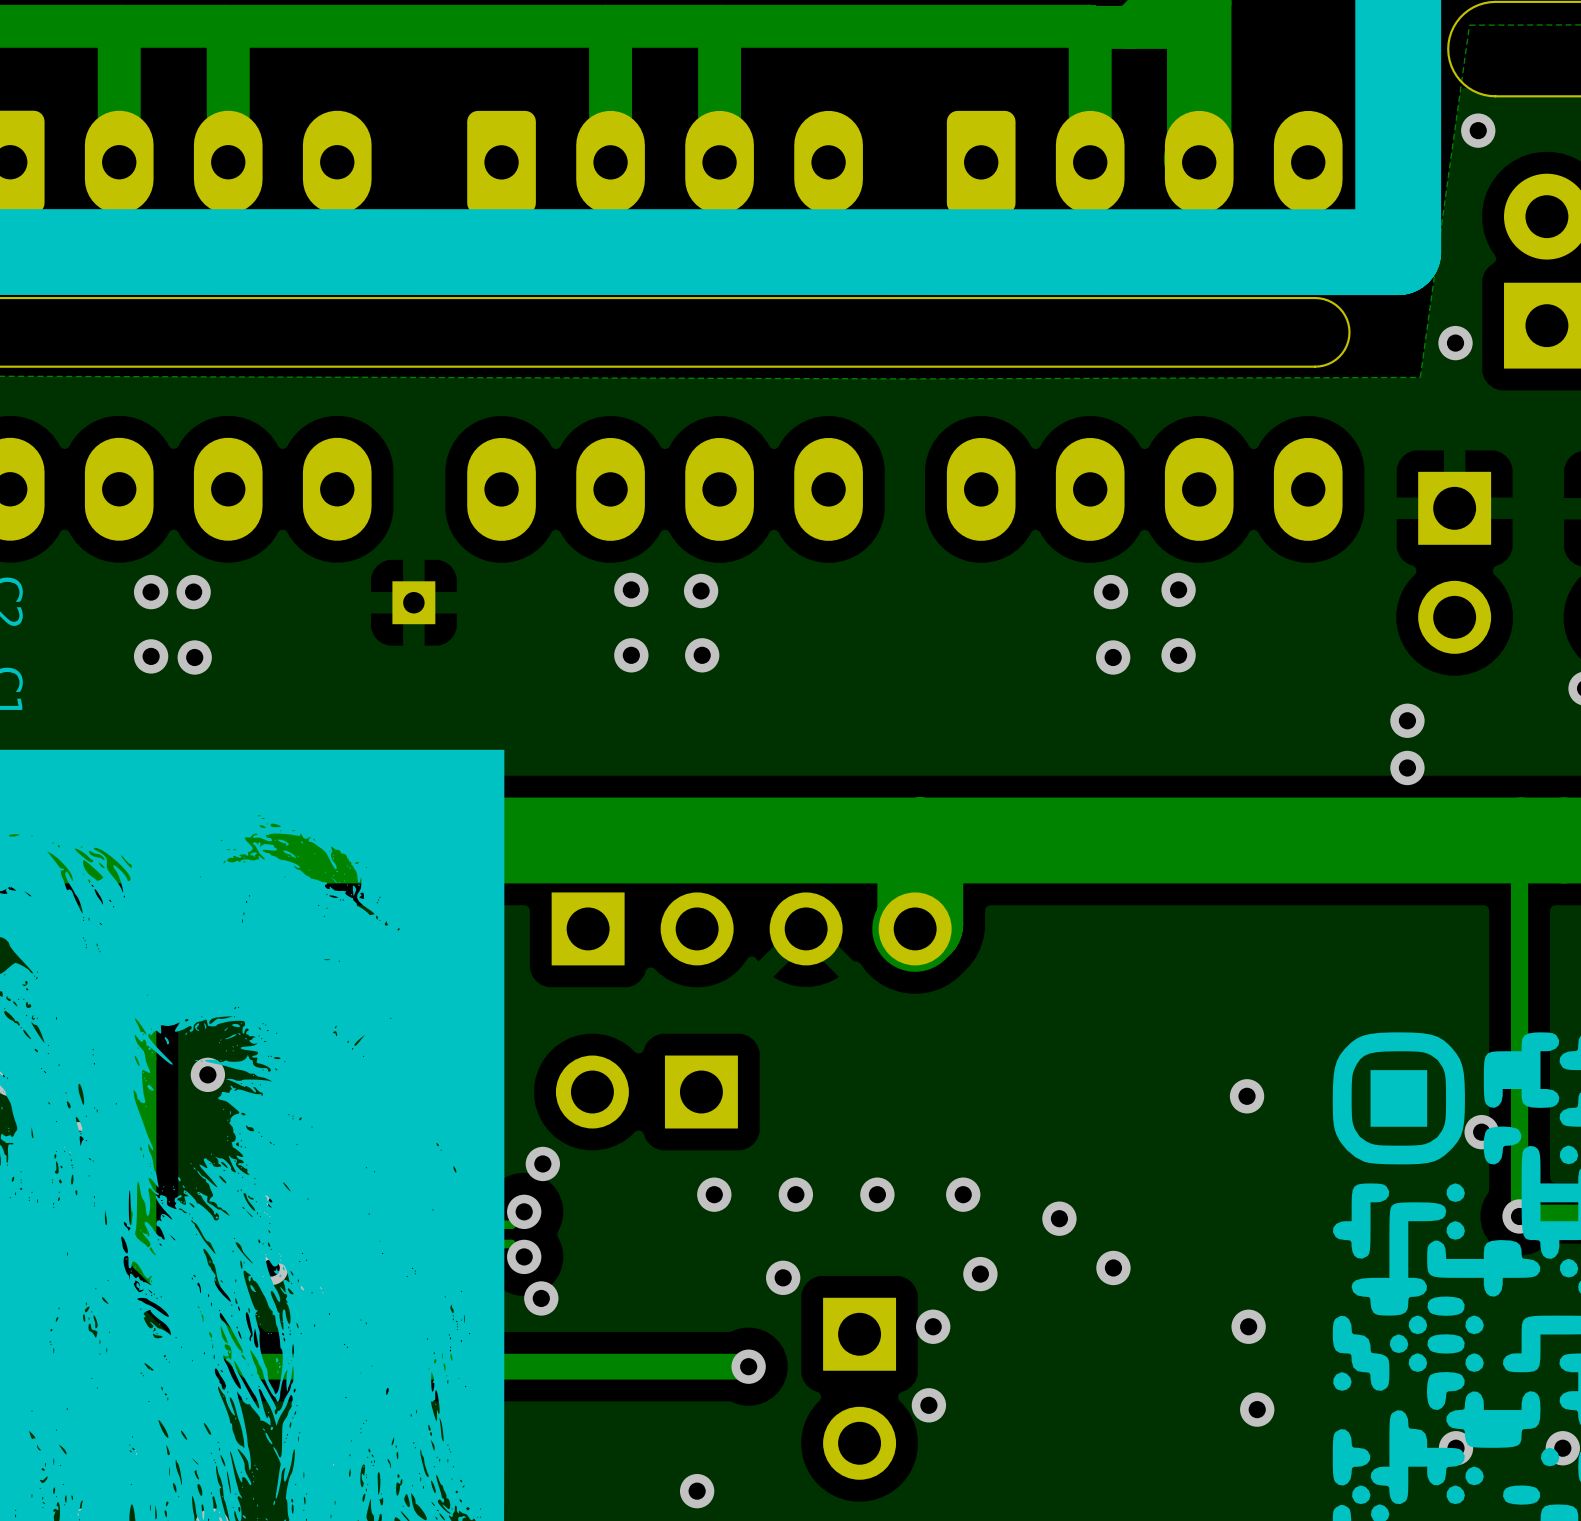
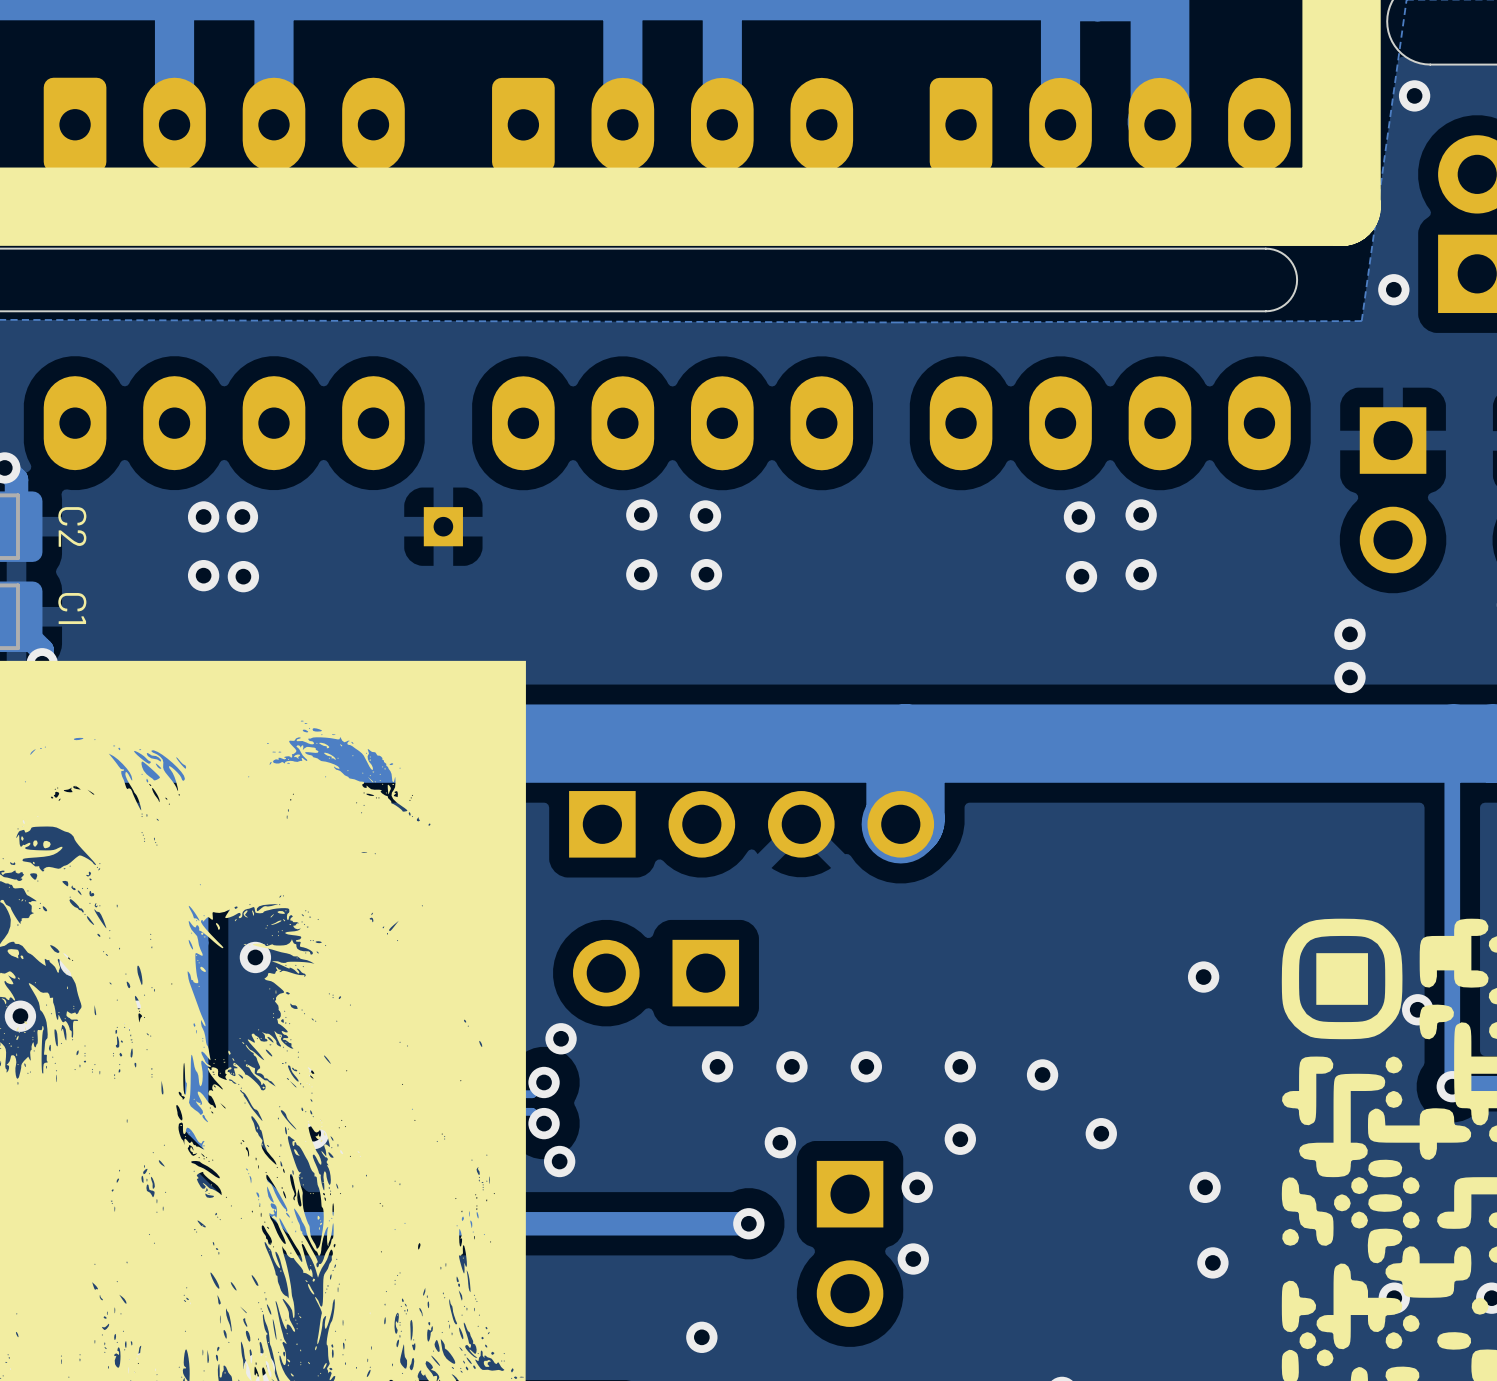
via position: (963, 1194) -> (960, 1066)
via position: (1059, 1218) -> (1042, 1074)
via position: (1113, 1267) -> (1101, 1133)

